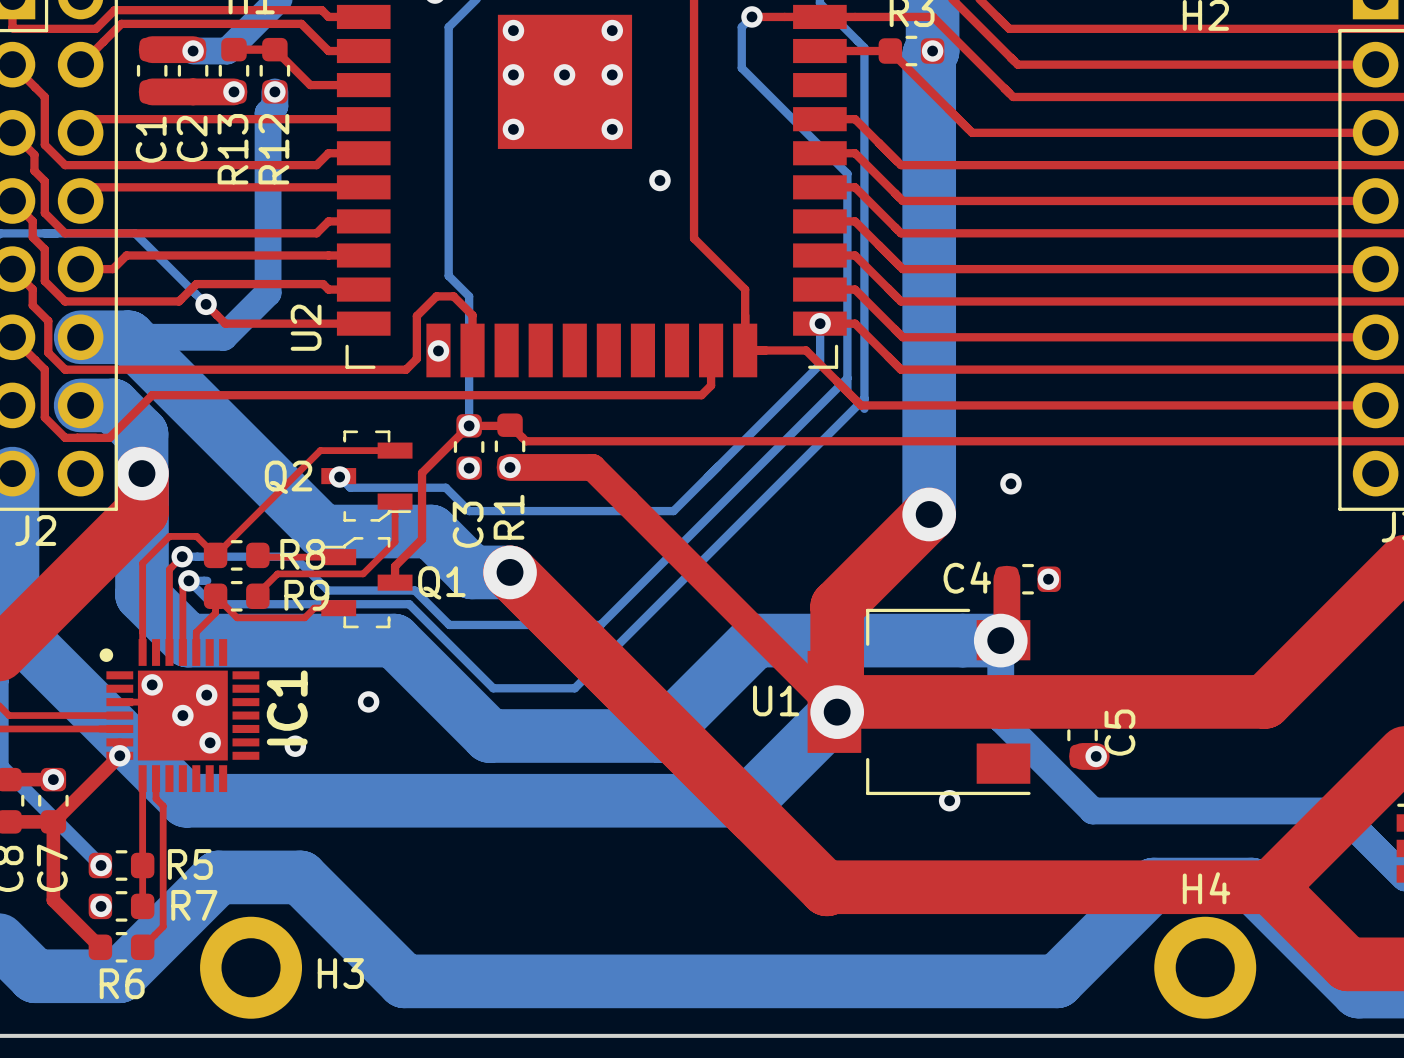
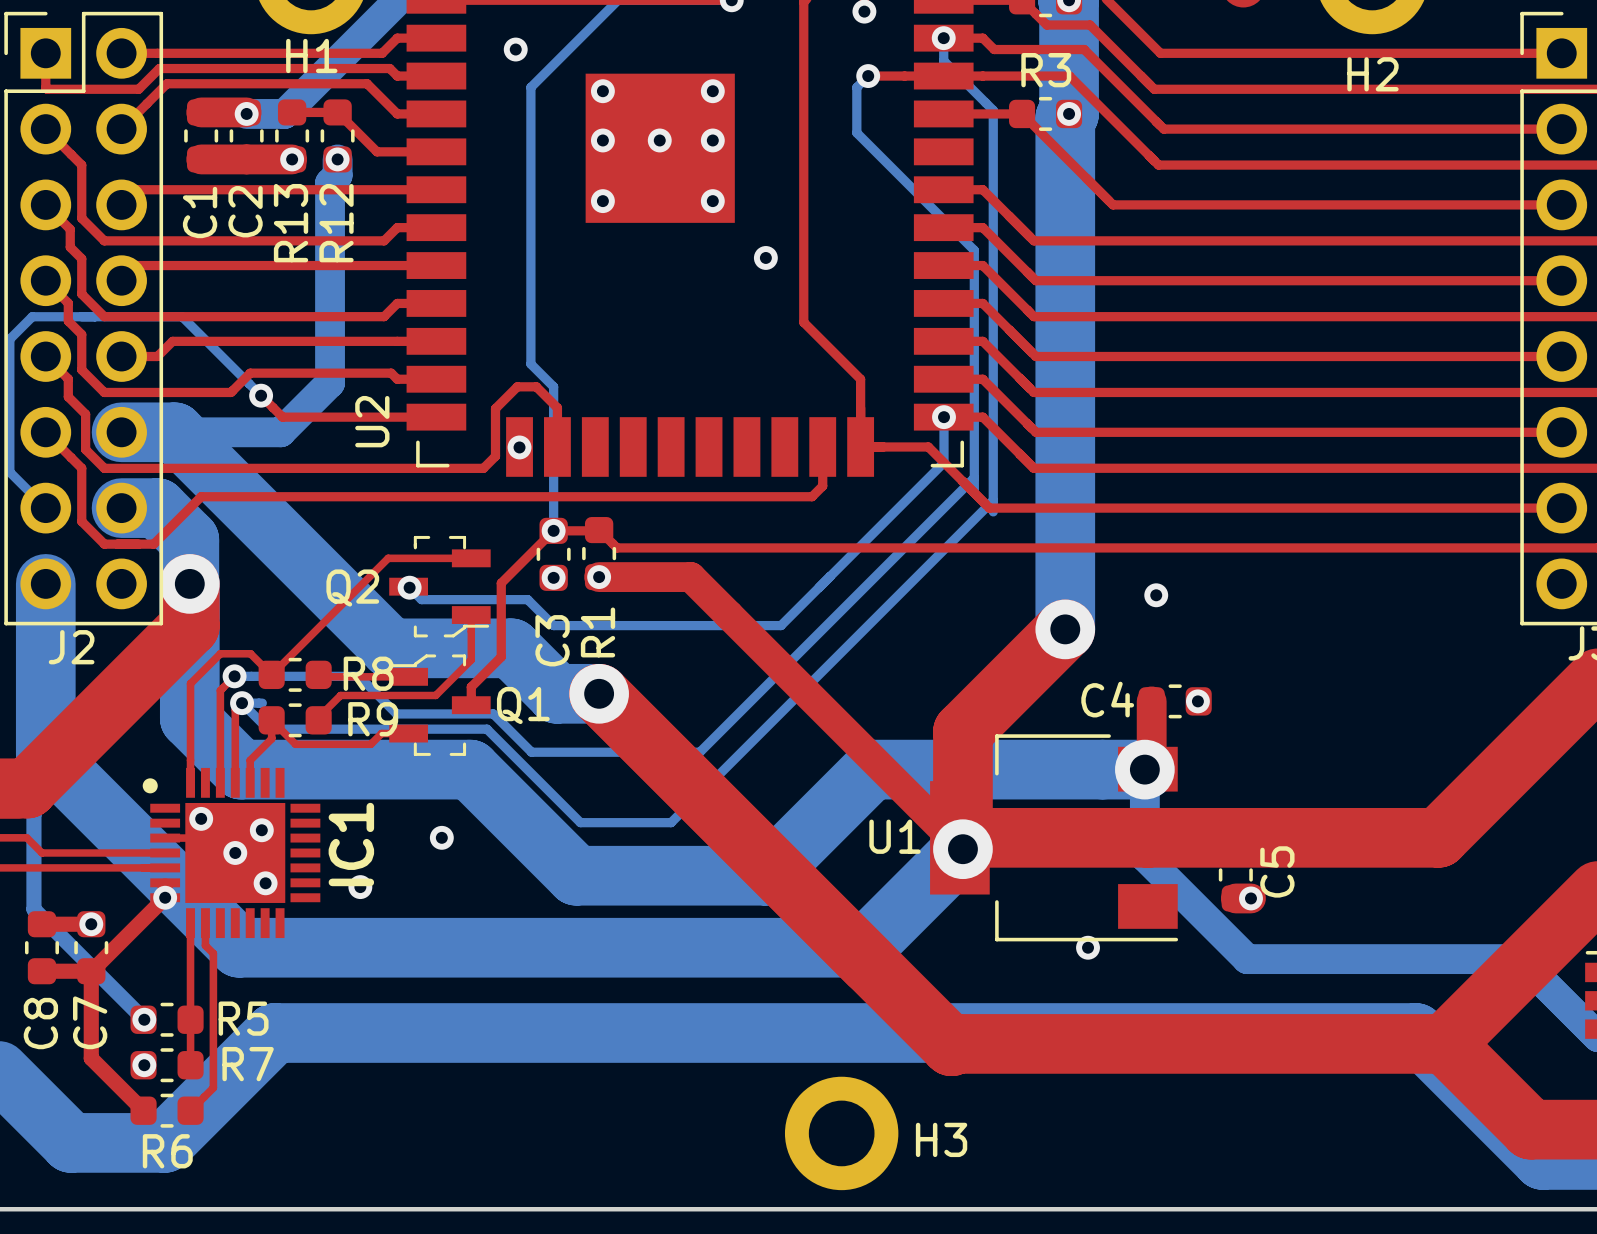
bottom track: (300, 877) (404, 981) (1056, 981) (1153, 884) (1251, 884) -> (366, 1033) (1415, 1033) (1423, 1040)
H3 position: (251, 967) -> (841, 1133)
H4: (1205, 967) -> none

